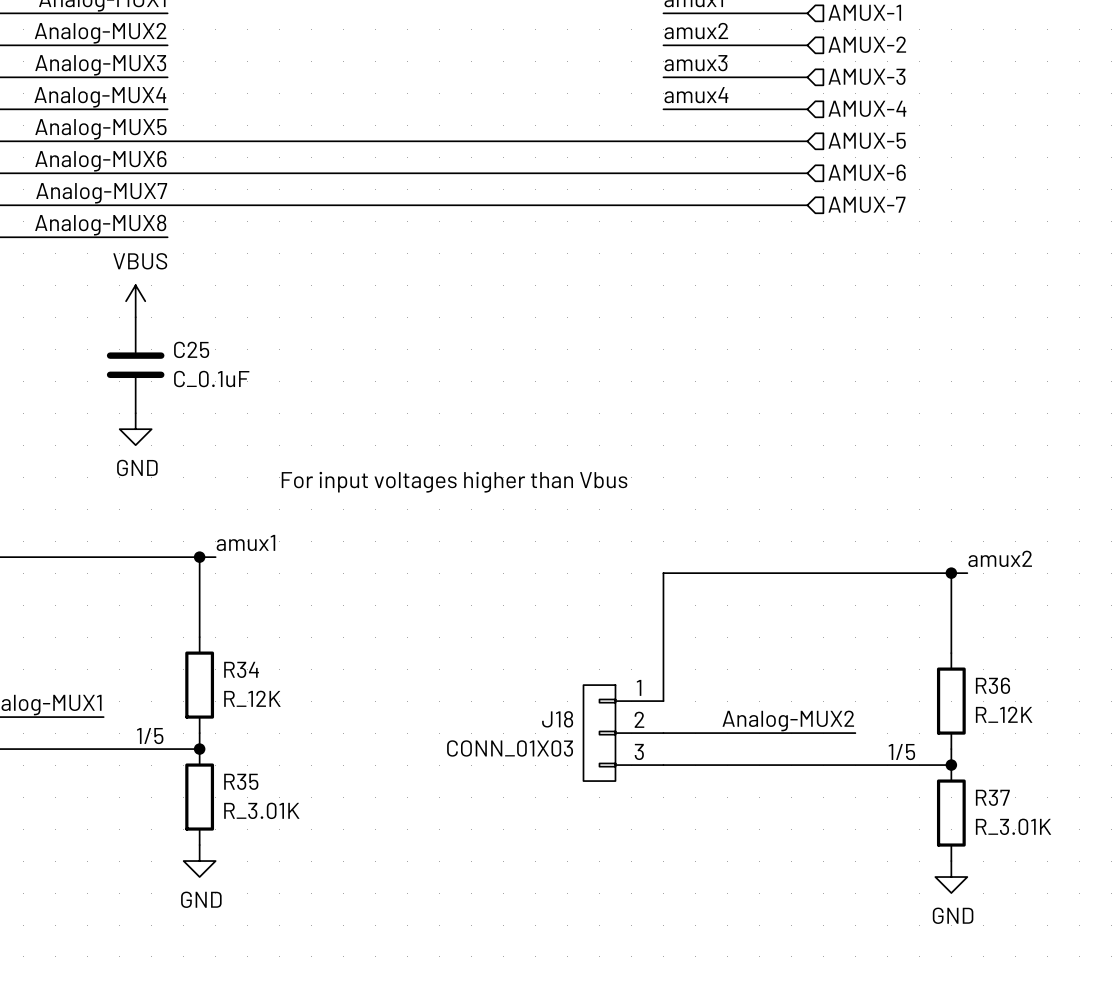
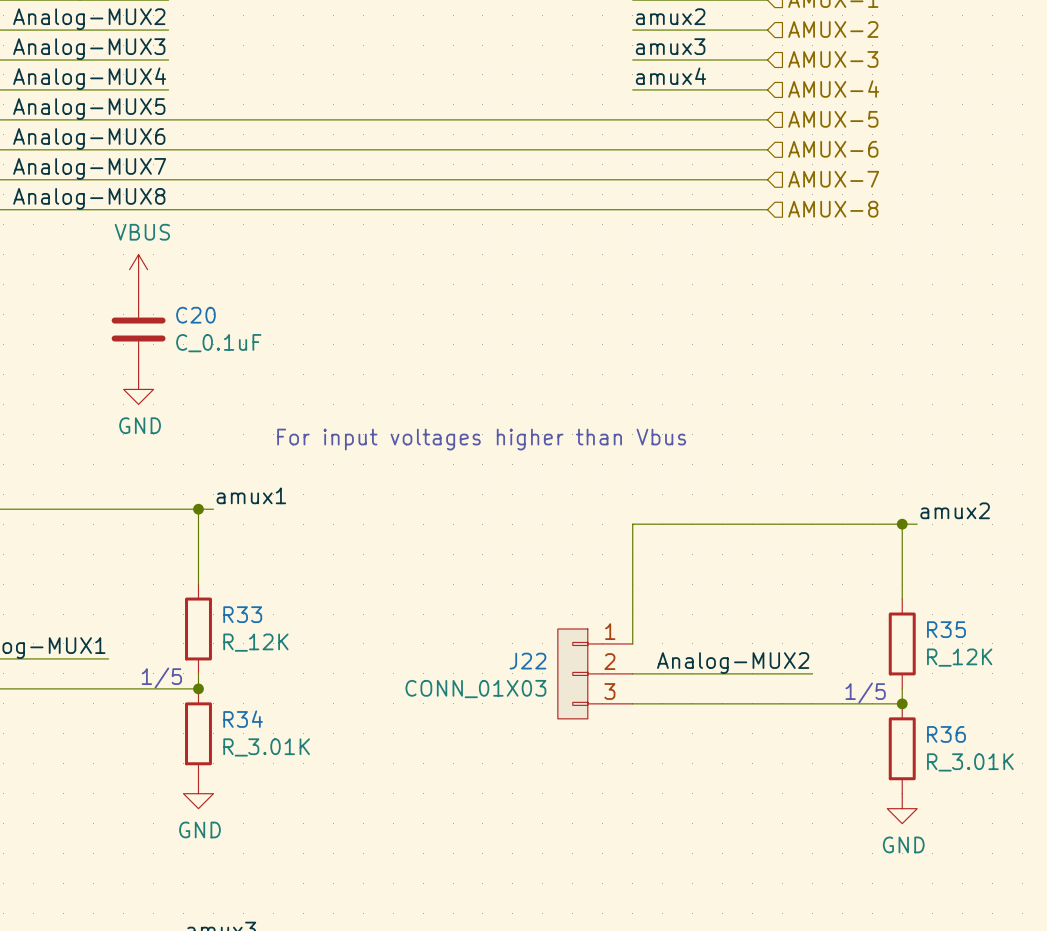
hierarchical label: none -> AMUX-8 (833, 209)
wire: none -> (168, 209) (767, 209)
C25 name: C25 (191, 349) -> C20 (195, 315)
R34 name: R34 (241, 669) -> R33 (242, 614)
R36 name: R36 (993, 685) -> R35 (946, 629)
J18 name: J18 (557, 719) -> J22 (527, 661)
R35 name: R35 (241, 781) -> R34 (243, 719)
R37 name: R37 (992, 797) -> R36 (946, 734)

